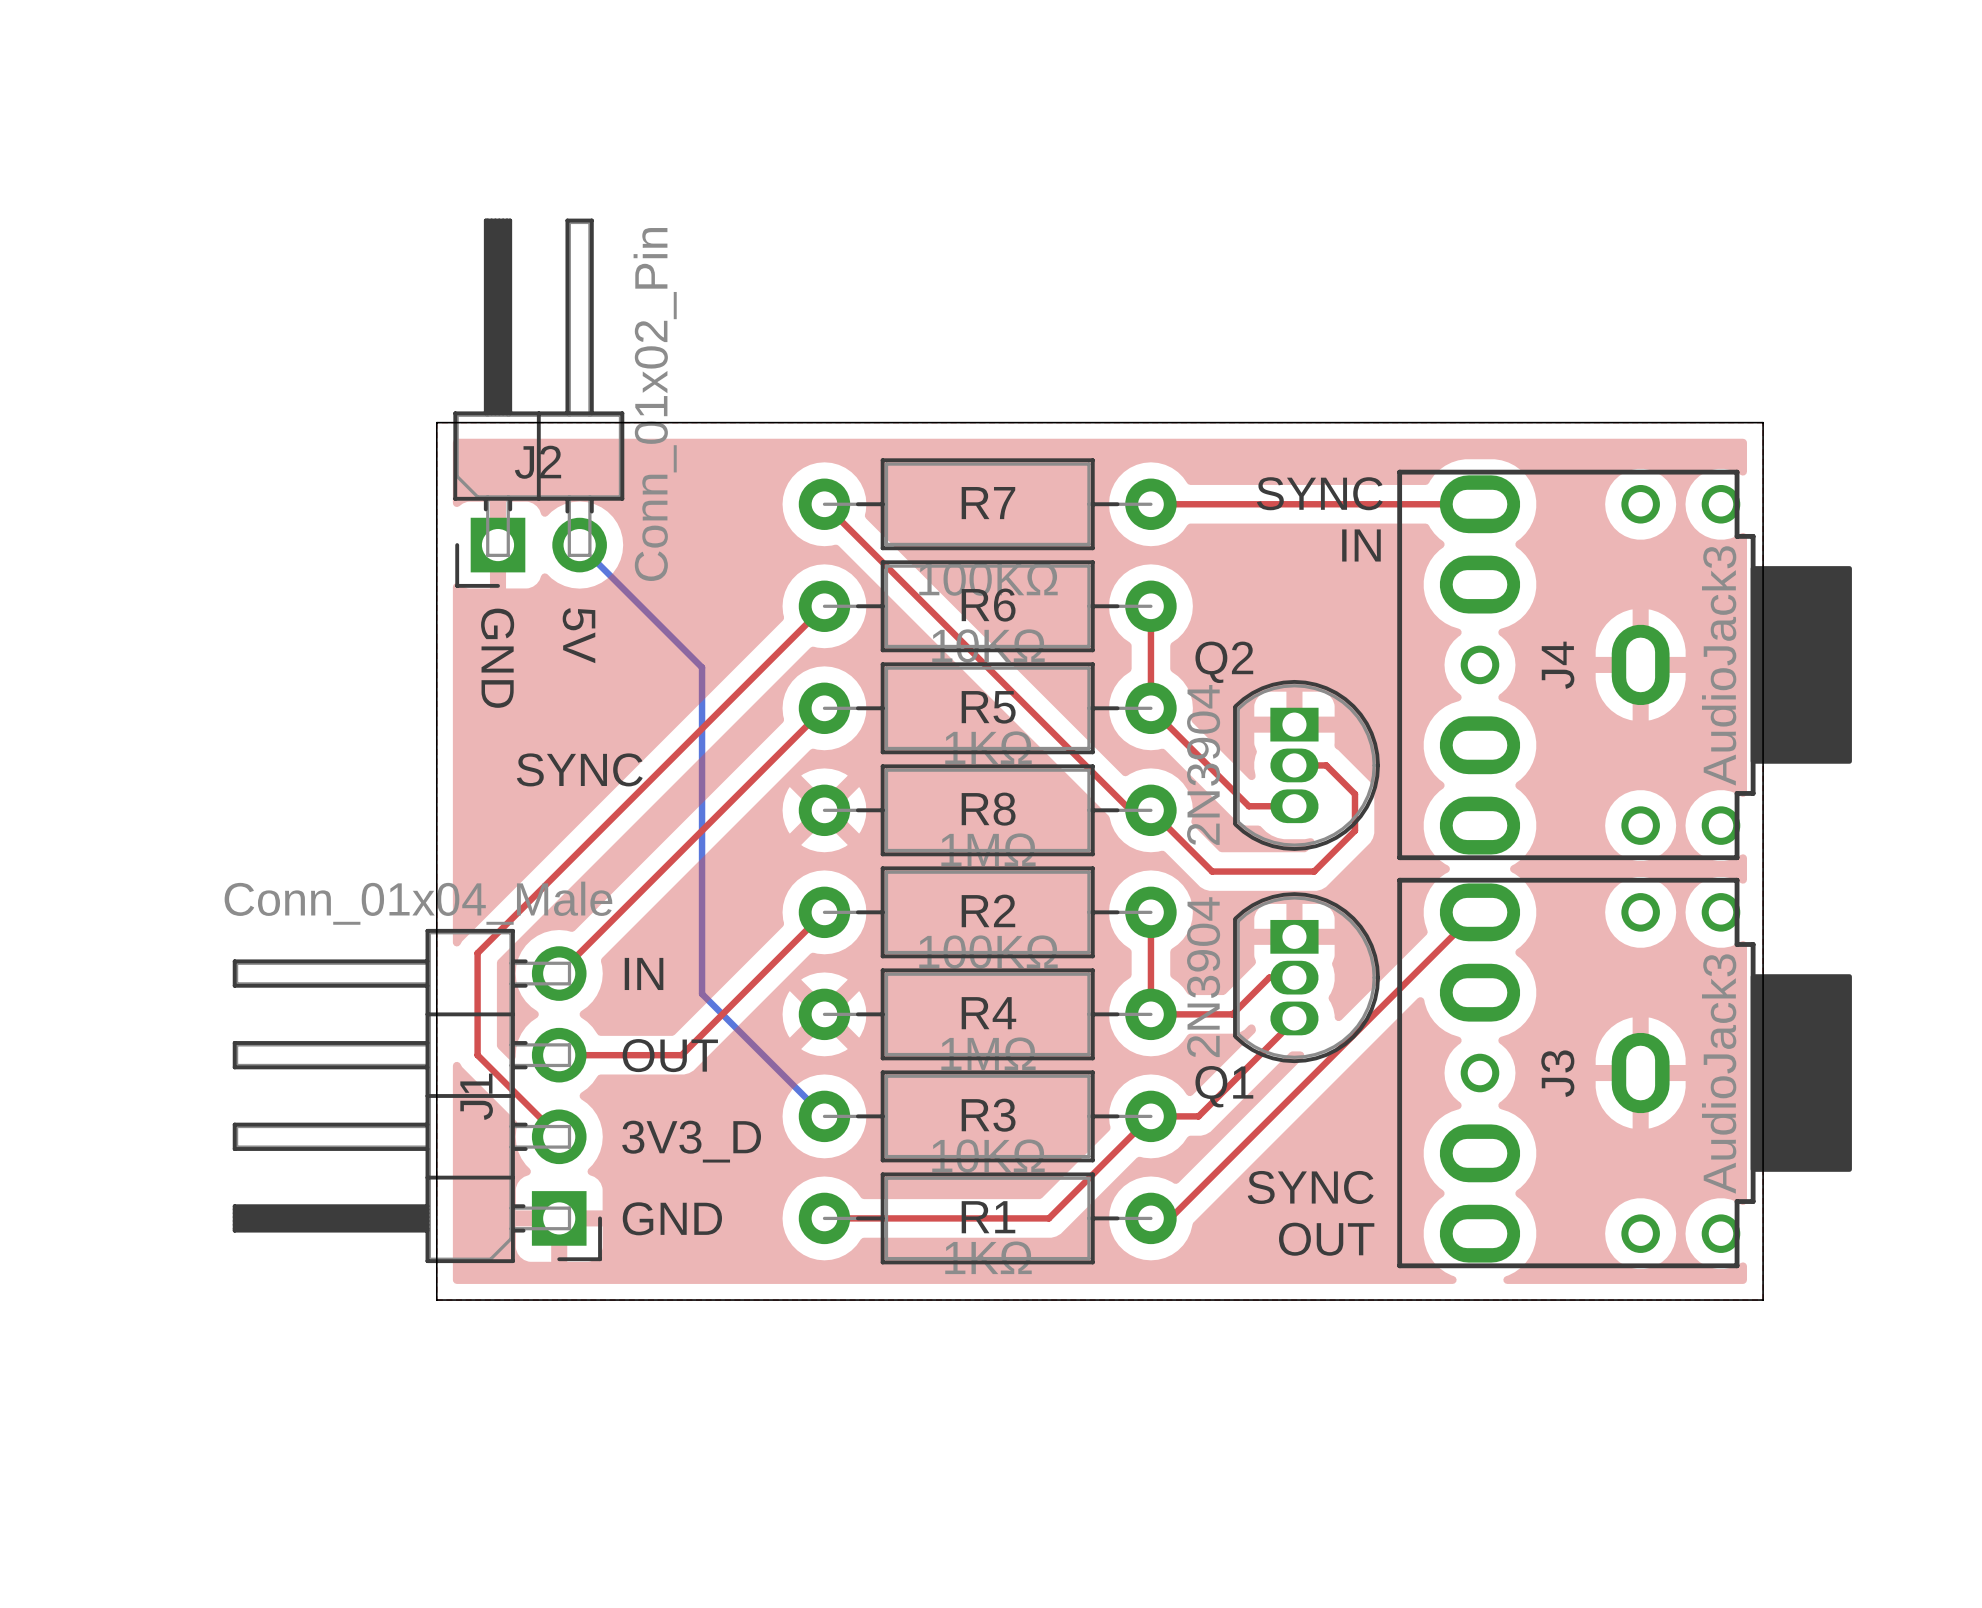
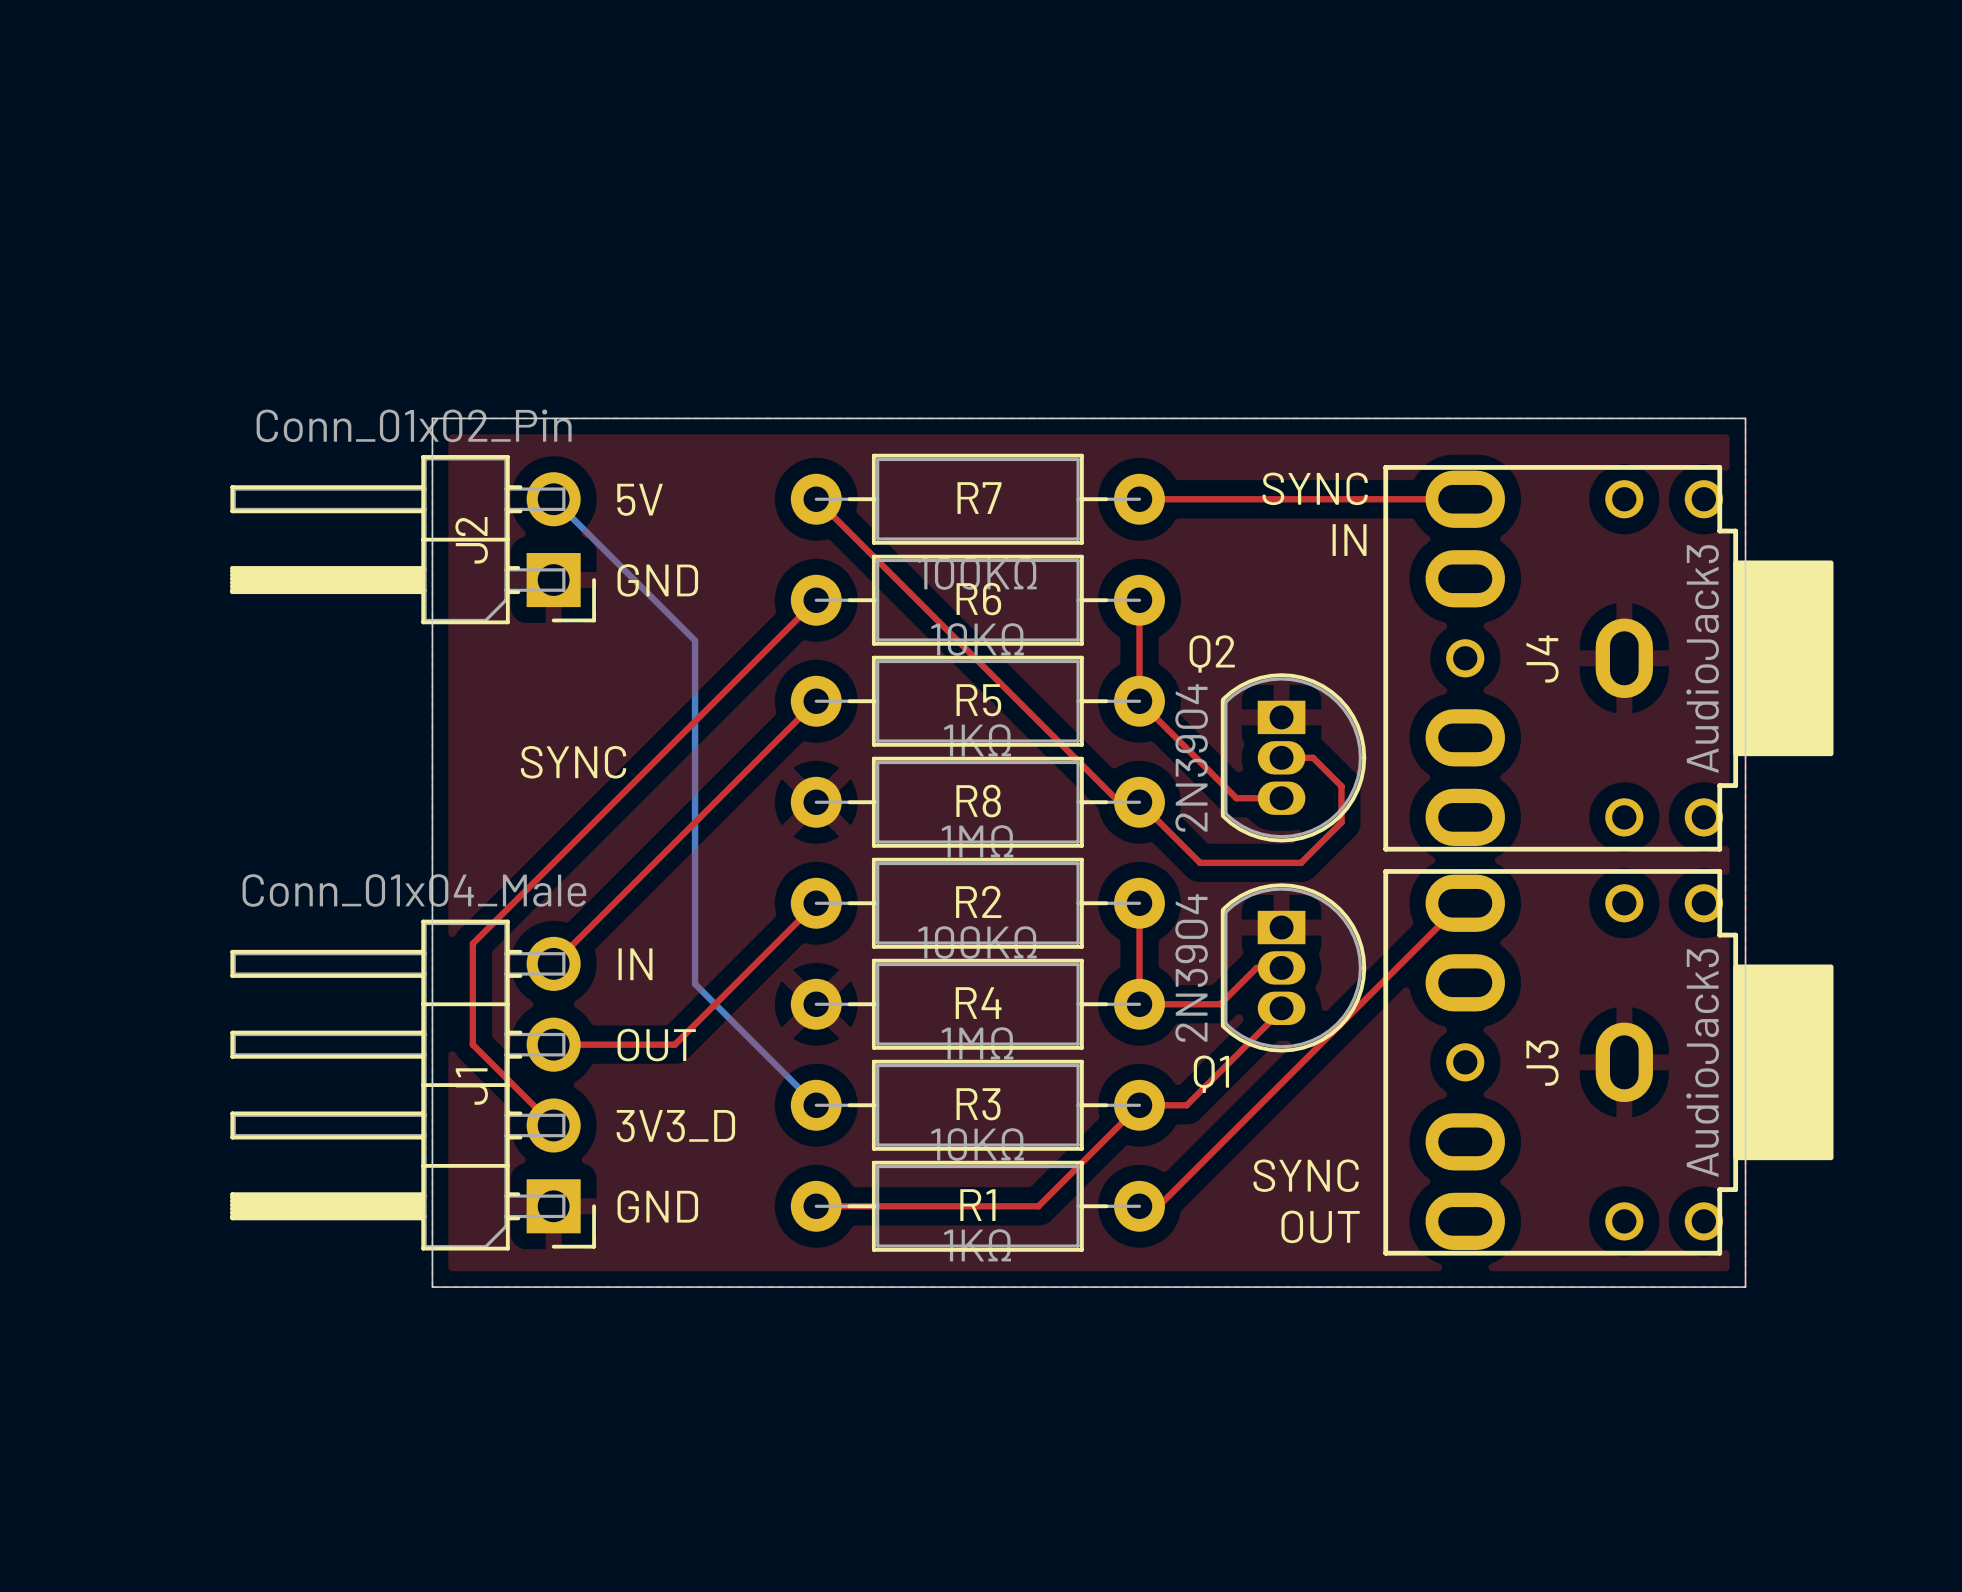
J2 rotation: 0° (538, 403) -> 90° counterclockwise (413, 539)
bottom track: (579, 545) (702, 667) -> (553, 499) (695, 640) (695, 660)
text rotation: 0° (578, 635) -> 90° counterclockwise (640, 499)
text position: 5V (578, 635) -> 5V (640, 499)
text rotation: 0° (497, 658) -> 90° counterclockwise (657, 580)
text position: GND (497, 658) -> GND (657, 580)

